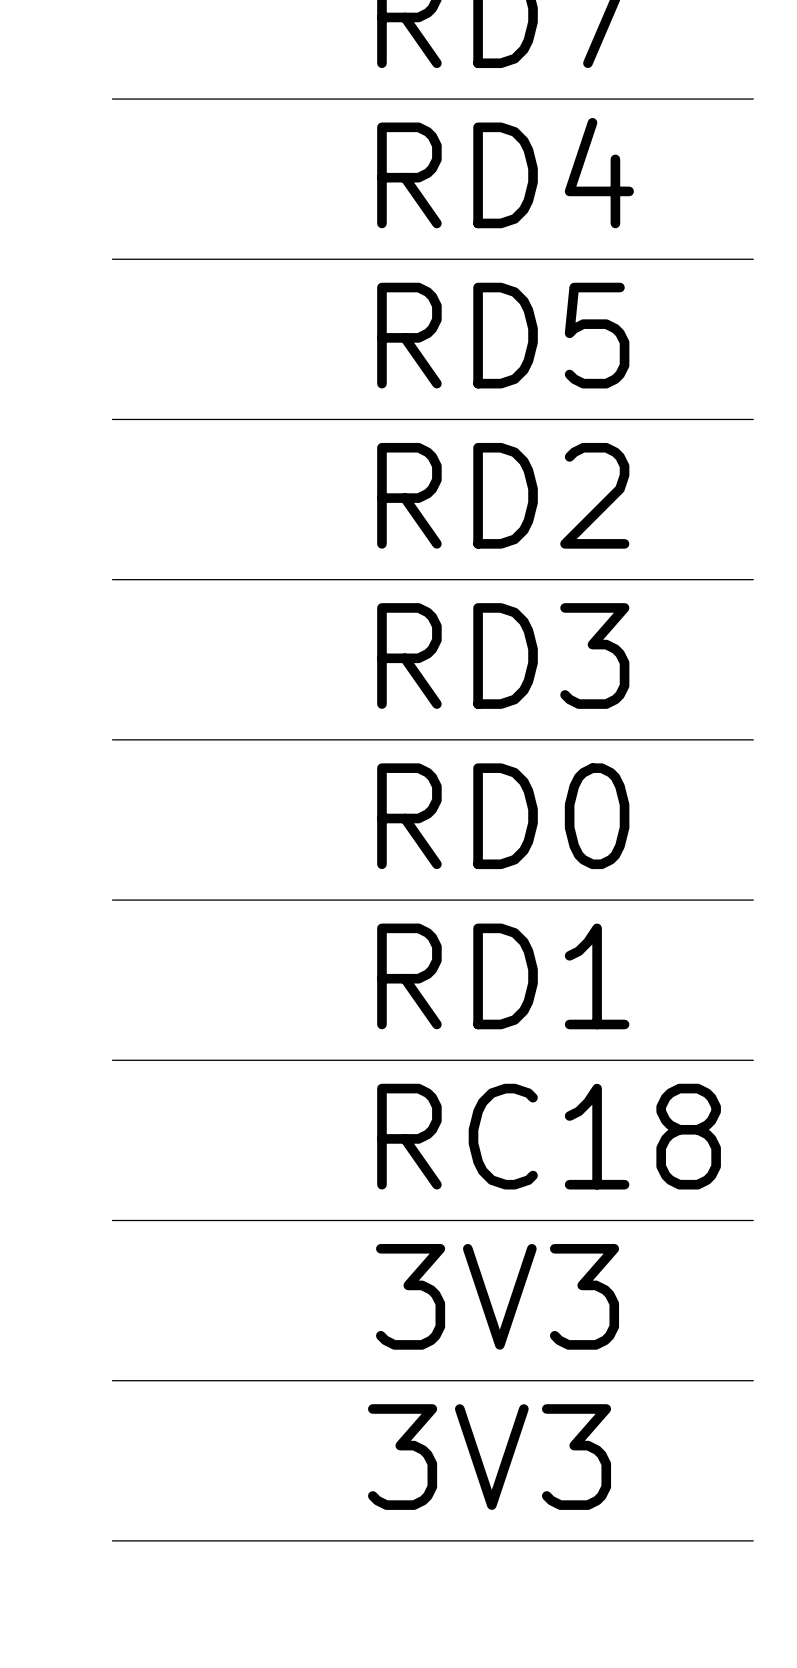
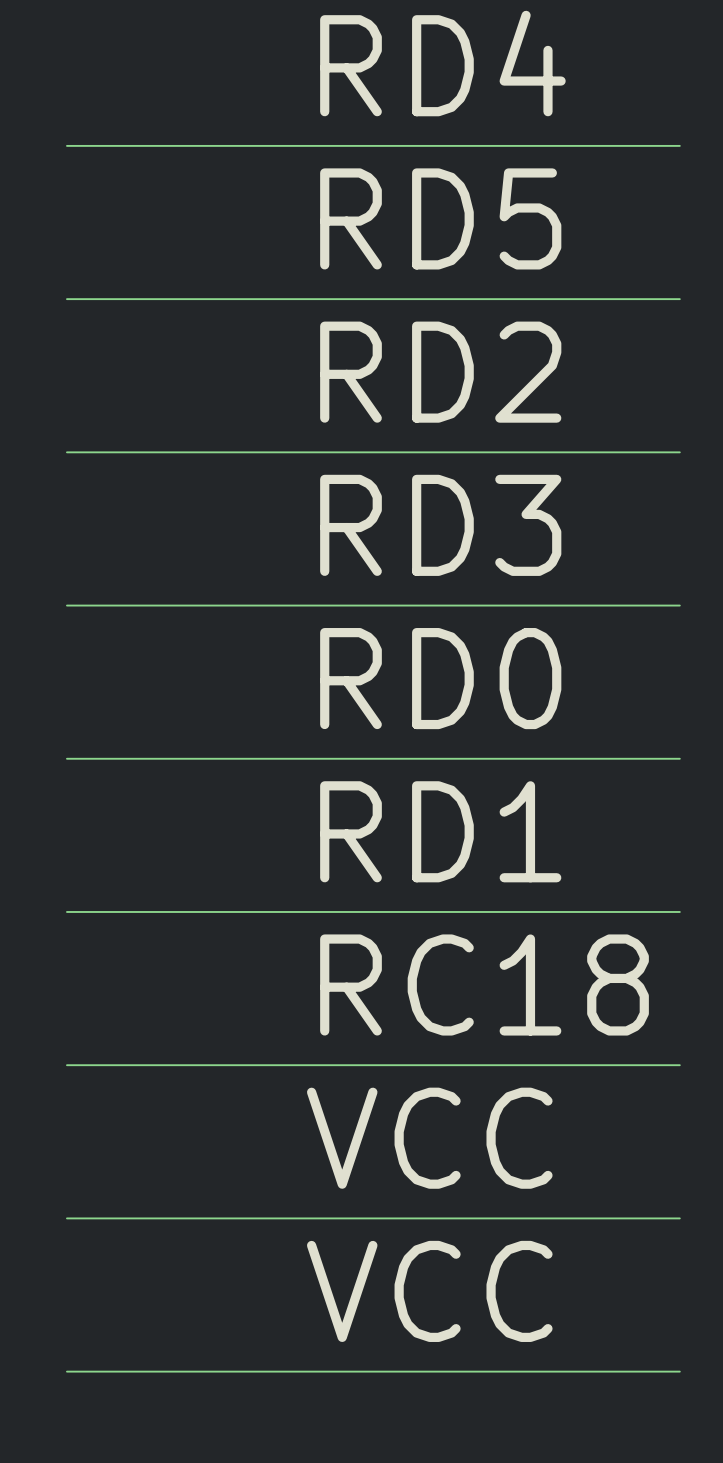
label: 3V3 (497, 1296) -> VCC (429, 1138)
label: 3V3 (489, 1457) -> VCC (429, 1291)

